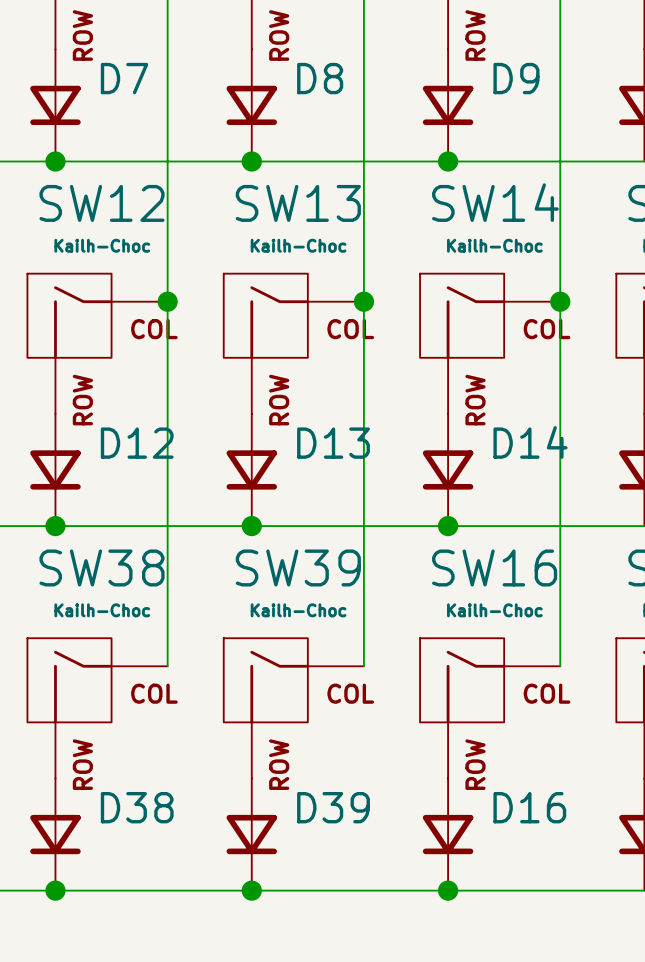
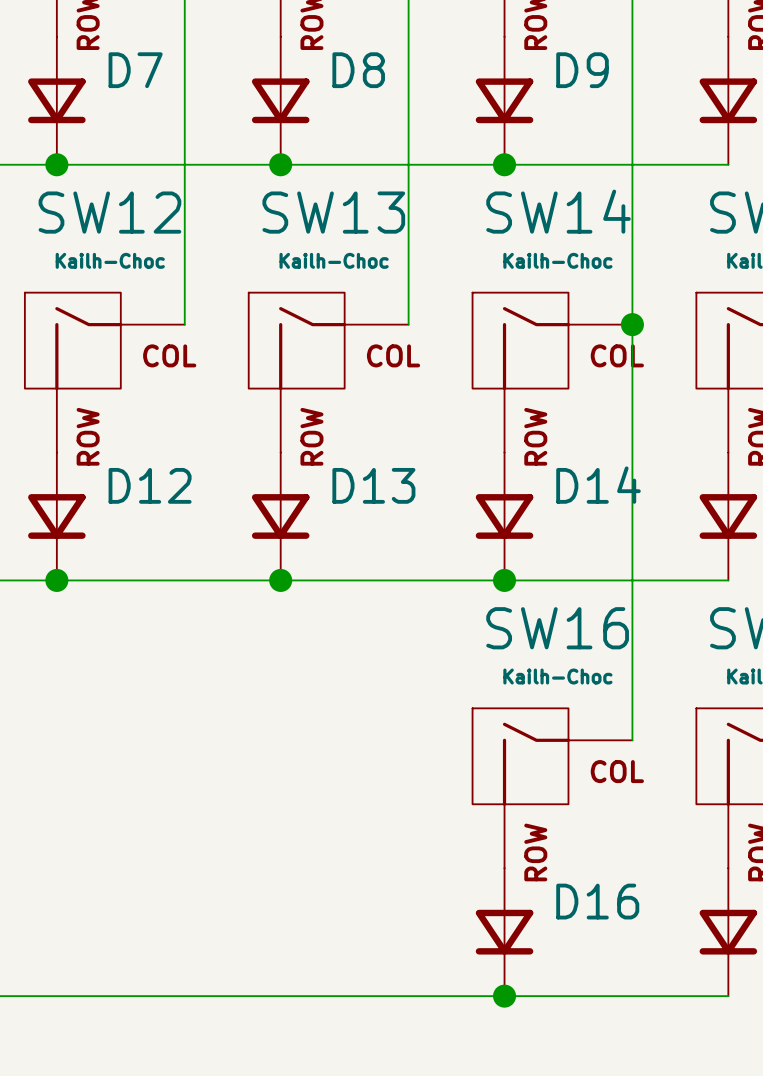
wire: (167, 301) (167, 666) -> none
junction: (167, 301) -> none
wire: (363, 301) (363, 666) -> none
junction: (363, 301) -> none
SW38: Kailh-Choc (97, 708) -> none
SW39: Kailh-Choc (293, 708) -> none
D38: (55, 834) -> none
D39: (251, 834) -> none
junction: (55, 890) -> none
junction: (251, 890) -> none

